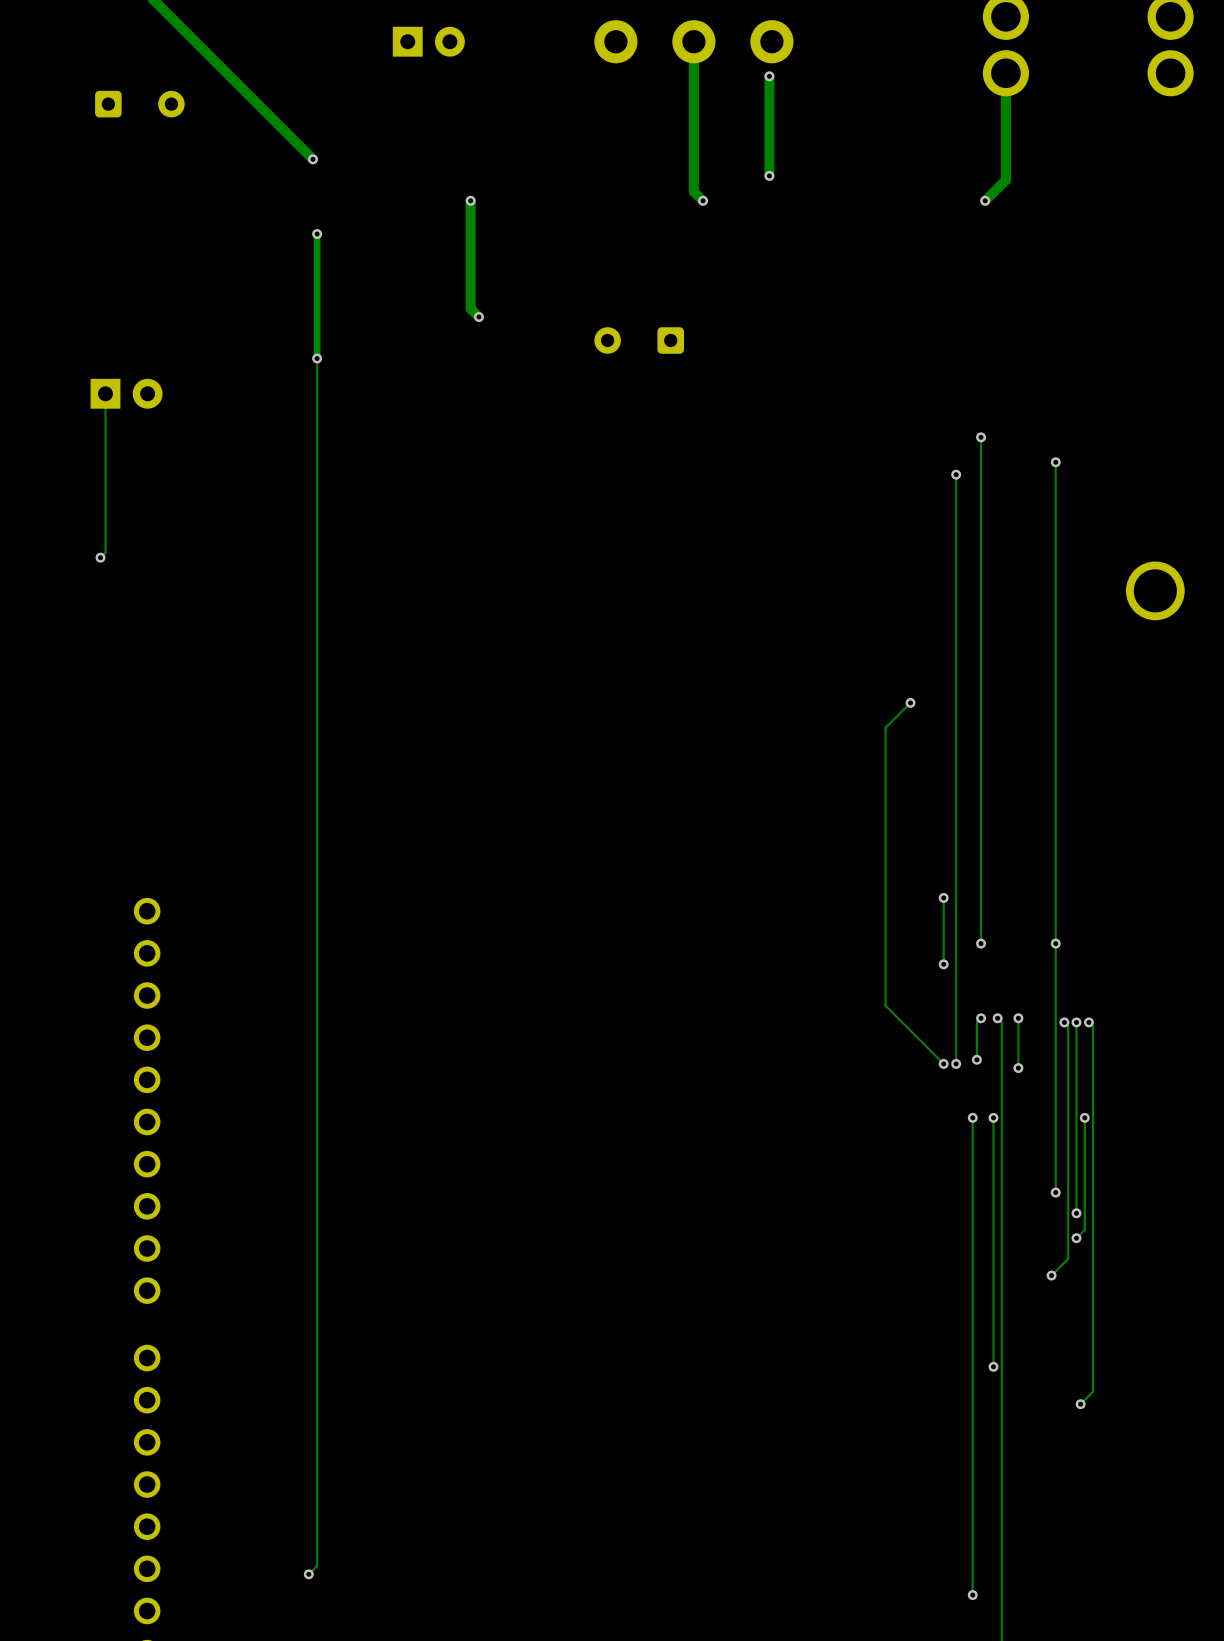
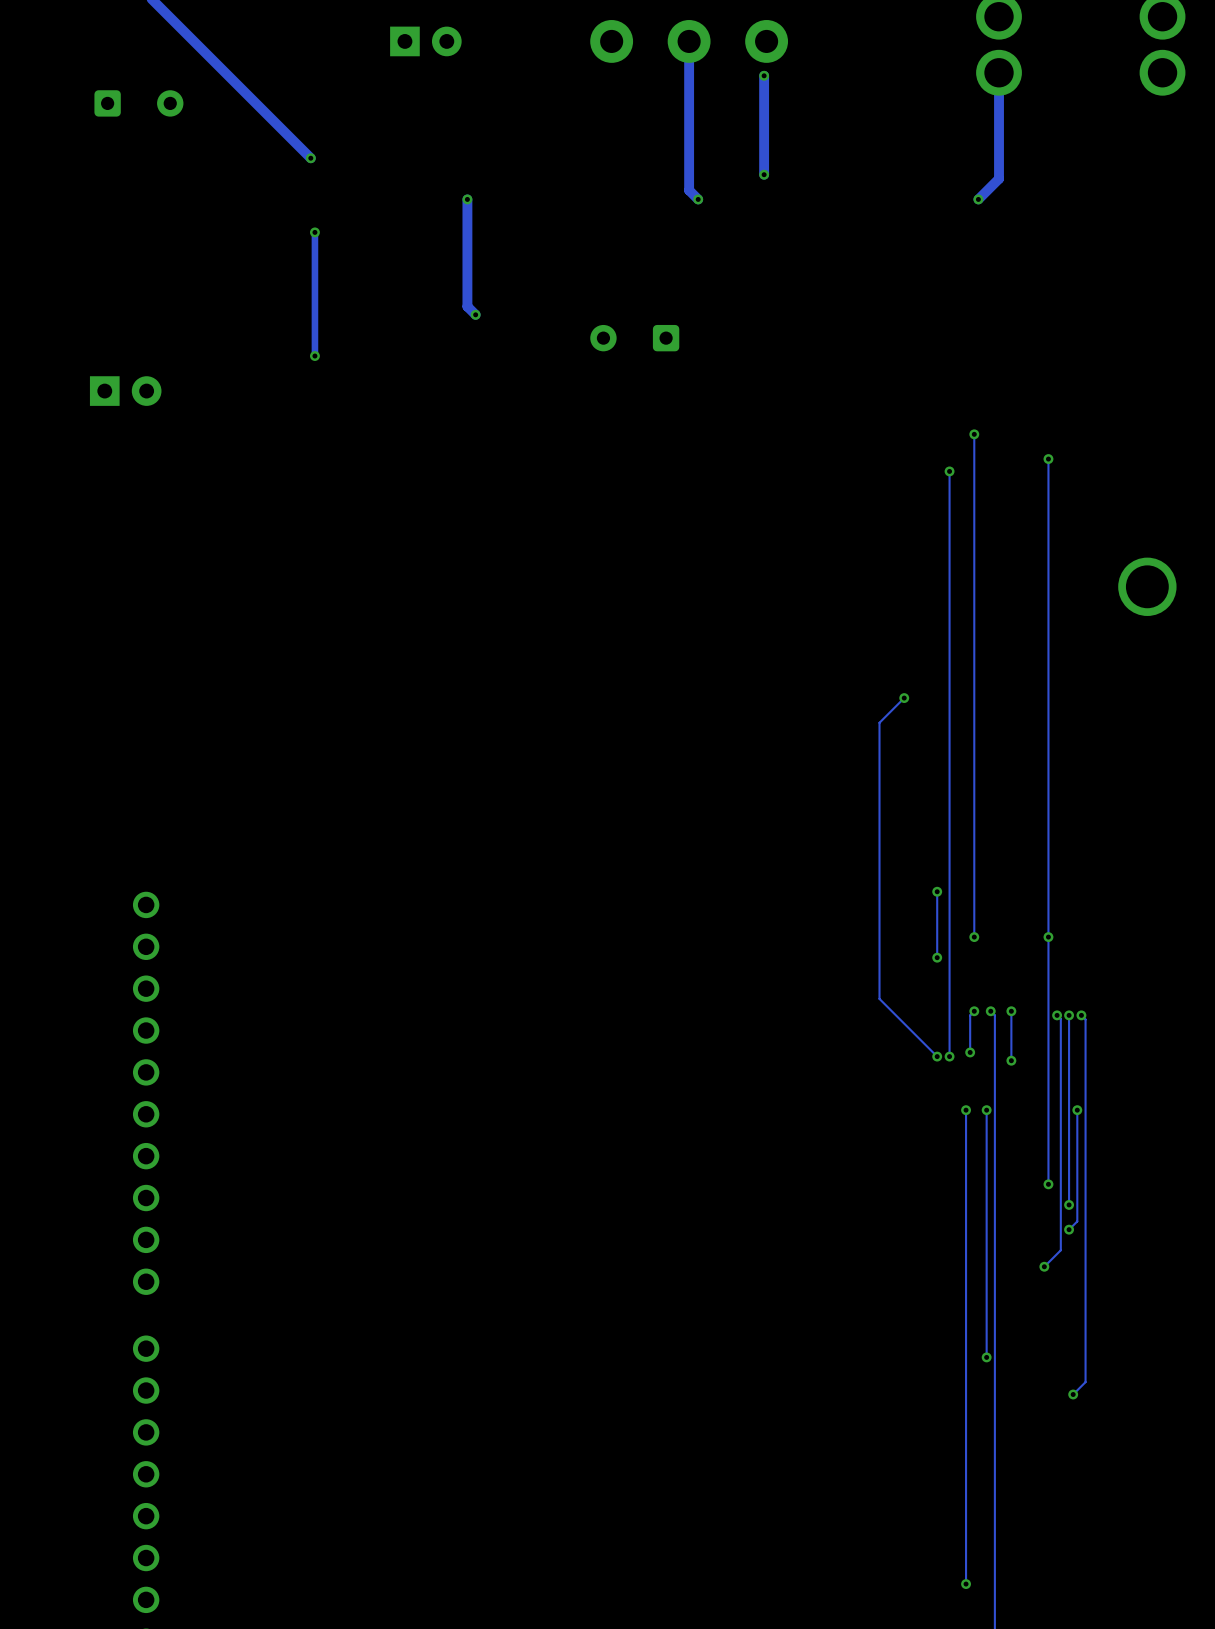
track: (317, 358) (317, 1566) (308, 1574) -> none
track: (105, 393) (105, 552) (100, 557) -> none
via: (100, 557) -> none
via: (308, 1574) -> none

